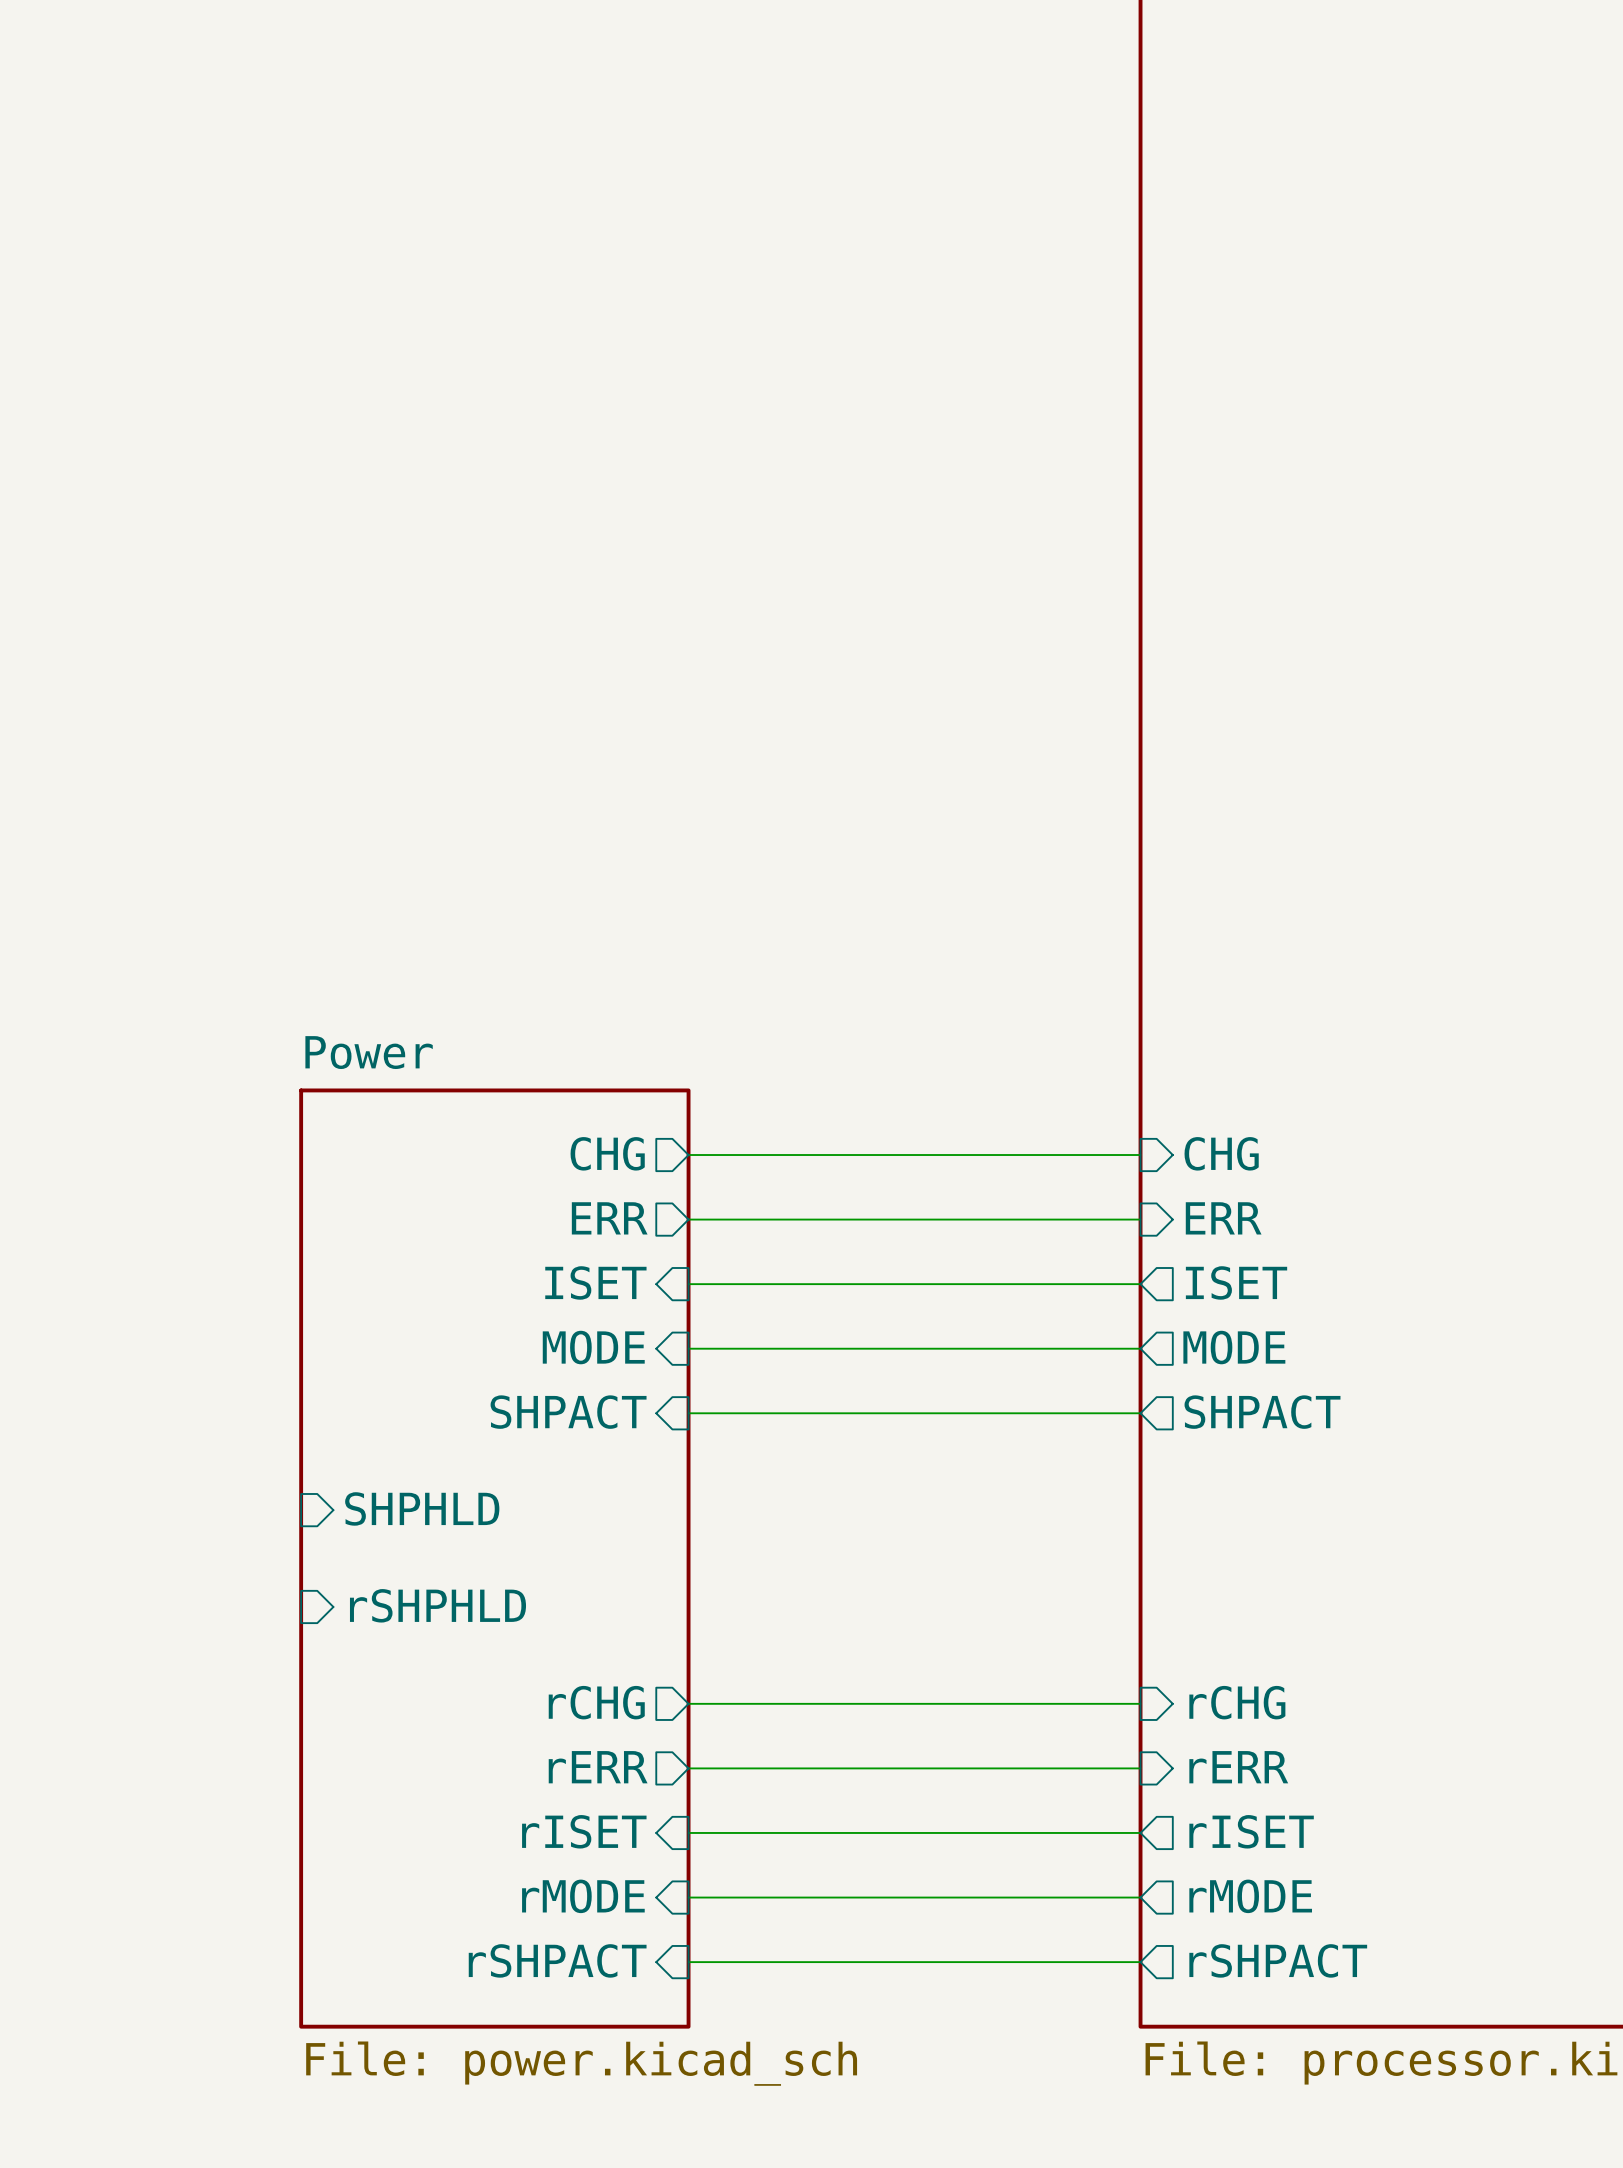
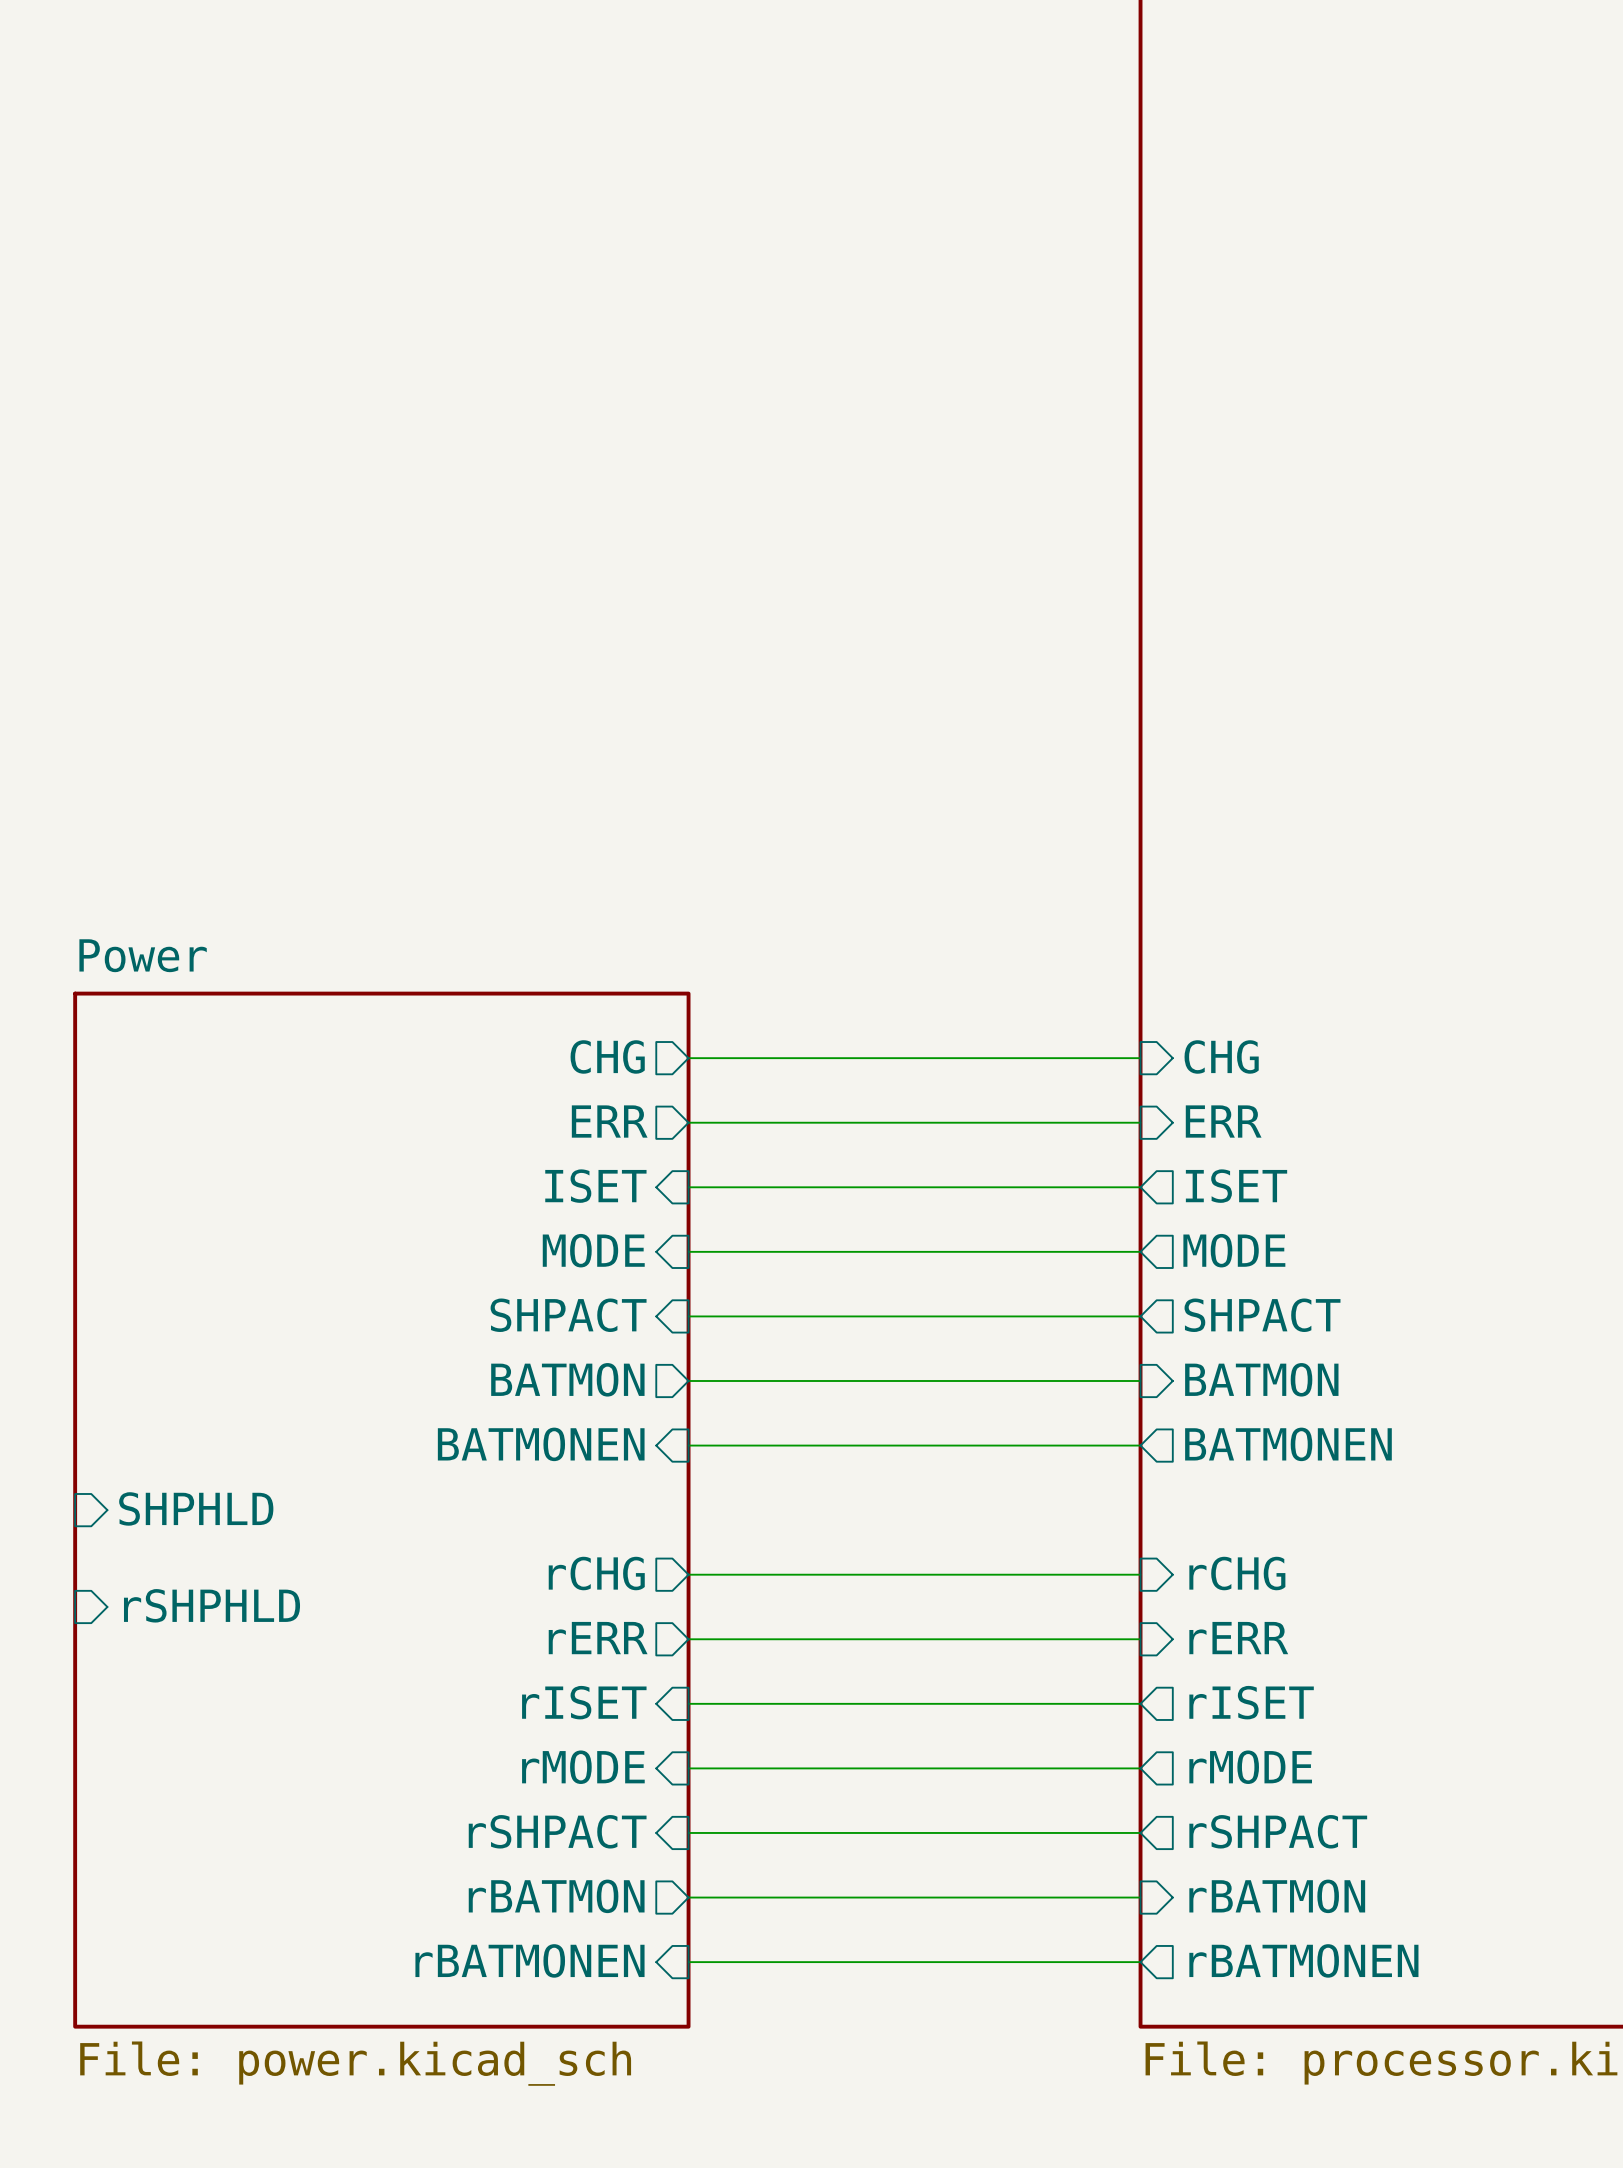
wire: none -> (688, 1058) (1140, 1058)
sheet pin position: CHG (607, 1153) -> CHG (607, 1056)
sheet pin position: CHG (1221, 1153) -> CHG (1221, 1056)
wire: (688, 1155) (1140, 1155) -> (688, 1122) (1140, 1122)
sheet pin position: ERR (609, 1218) -> ERR (609, 1121)
sheet pin position: ERR (1223, 1218) -> ERR (1223, 1121)
wire: (688, 1219) (1140, 1219) -> (688, 1251) (1140, 1251)
sheet pin position: ISET (595, 1282) -> ISET (595, 1186)
sheet pin position: ISET (1236, 1282) -> ISET (1236, 1186)
wire: (688, 1284) (1140, 1284) -> (688, 1187) (1140, 1187)
sheet pin position: MODE (593, 1347) -> MODE (593, 1250)
sheet pin position: MODE (1234, 1347) -> MODE (1234, 1250)
wire: (688, 1348) (1140, 1348) -> (688, 1316) (1140, 1316)
sheet pin: none -> BATMON (567, 1379)
sheet pin: none -> BATMON (1261, 1379)
wire: none -> (688, 1380) (1140, 1380)
sheet pin position: SHPACT (568, 1412) -> SHPACT (568, 1315)
sheet pin position: SHPACT (1262, 1412) -> SHPACT (1262, 1315)
wire: (688, 1413) (1140, 1413) -> (688, 1445) (1140, 1445)
sheet pin: none -> BATMONEN (541, 1444)
sheet pin: none -> BATMONEN (1288, 1444)
sheet pin position: SHPHLD (422, 1508) -> SHPHLD (196, 1508)
sheet Power: none -> File: power.kicad_sch (381, 1510)
sheet Power: File: power.kicad_sch (494, 1558) -> none
sheet pin: none -> rCHG (596, 1573)
sheet pin: none -> rCHG (1237, 1573)
wire: none -> (688, 1574) (1140, 1574)
sheet pin position: rSHPHLD (437, 1605) -> rSHPHLD (212, 1605)
sheet pin: none -> rERR (598, 1638)
sheet pin: none -> rERR (1238, 1638)
wire: none -> (688, 1639) (1140, 1639)
sheet pin shape: output (596, 1702) -> input (584, 1702)
sheet pin: rCHG (596, 1702) -> rISET (584, 1702)
sheet pin shape: input (1237, 1702) -> output (1251, 1702)
sheet pin: rCHG (1237, 1702) -> rISET (1251, 1702)
sheet pin shape: output (598, 1767) -> input (583, 1767)
sheet pin: rERR (598, 1767) -> rMODE (583, 1767)
sheet pin shape: input (1238, 1767) -> output (1250, 1767)
sheet pin: rERR (1238, 1767) -> rMODE (1250, 1767)
sheet pin: rISET (584, 1831) -> rSHPACT (557, 1831)
sheet pin: rISET (1251, 1831) -> rSHPACT (1278, 1831)
sheet pin shape: input (583, 1896) -> output (556, 1896)
sheet pin: rMODE (583, 1896) -> rBATMON (556, 1896)
sheet pin shape: output (1250, 1896) -> input (1277, 1896)
sheet pin: rMODE (1250, 1896) -> rBATMON (1277, 1896)
sheet pin: rSHPACT (557, 1960) -> rBATMONEN (529, 1960)
sheet pin: rSHPACT (1278, 1960) -> rBATMONEN (1303, 1960)

